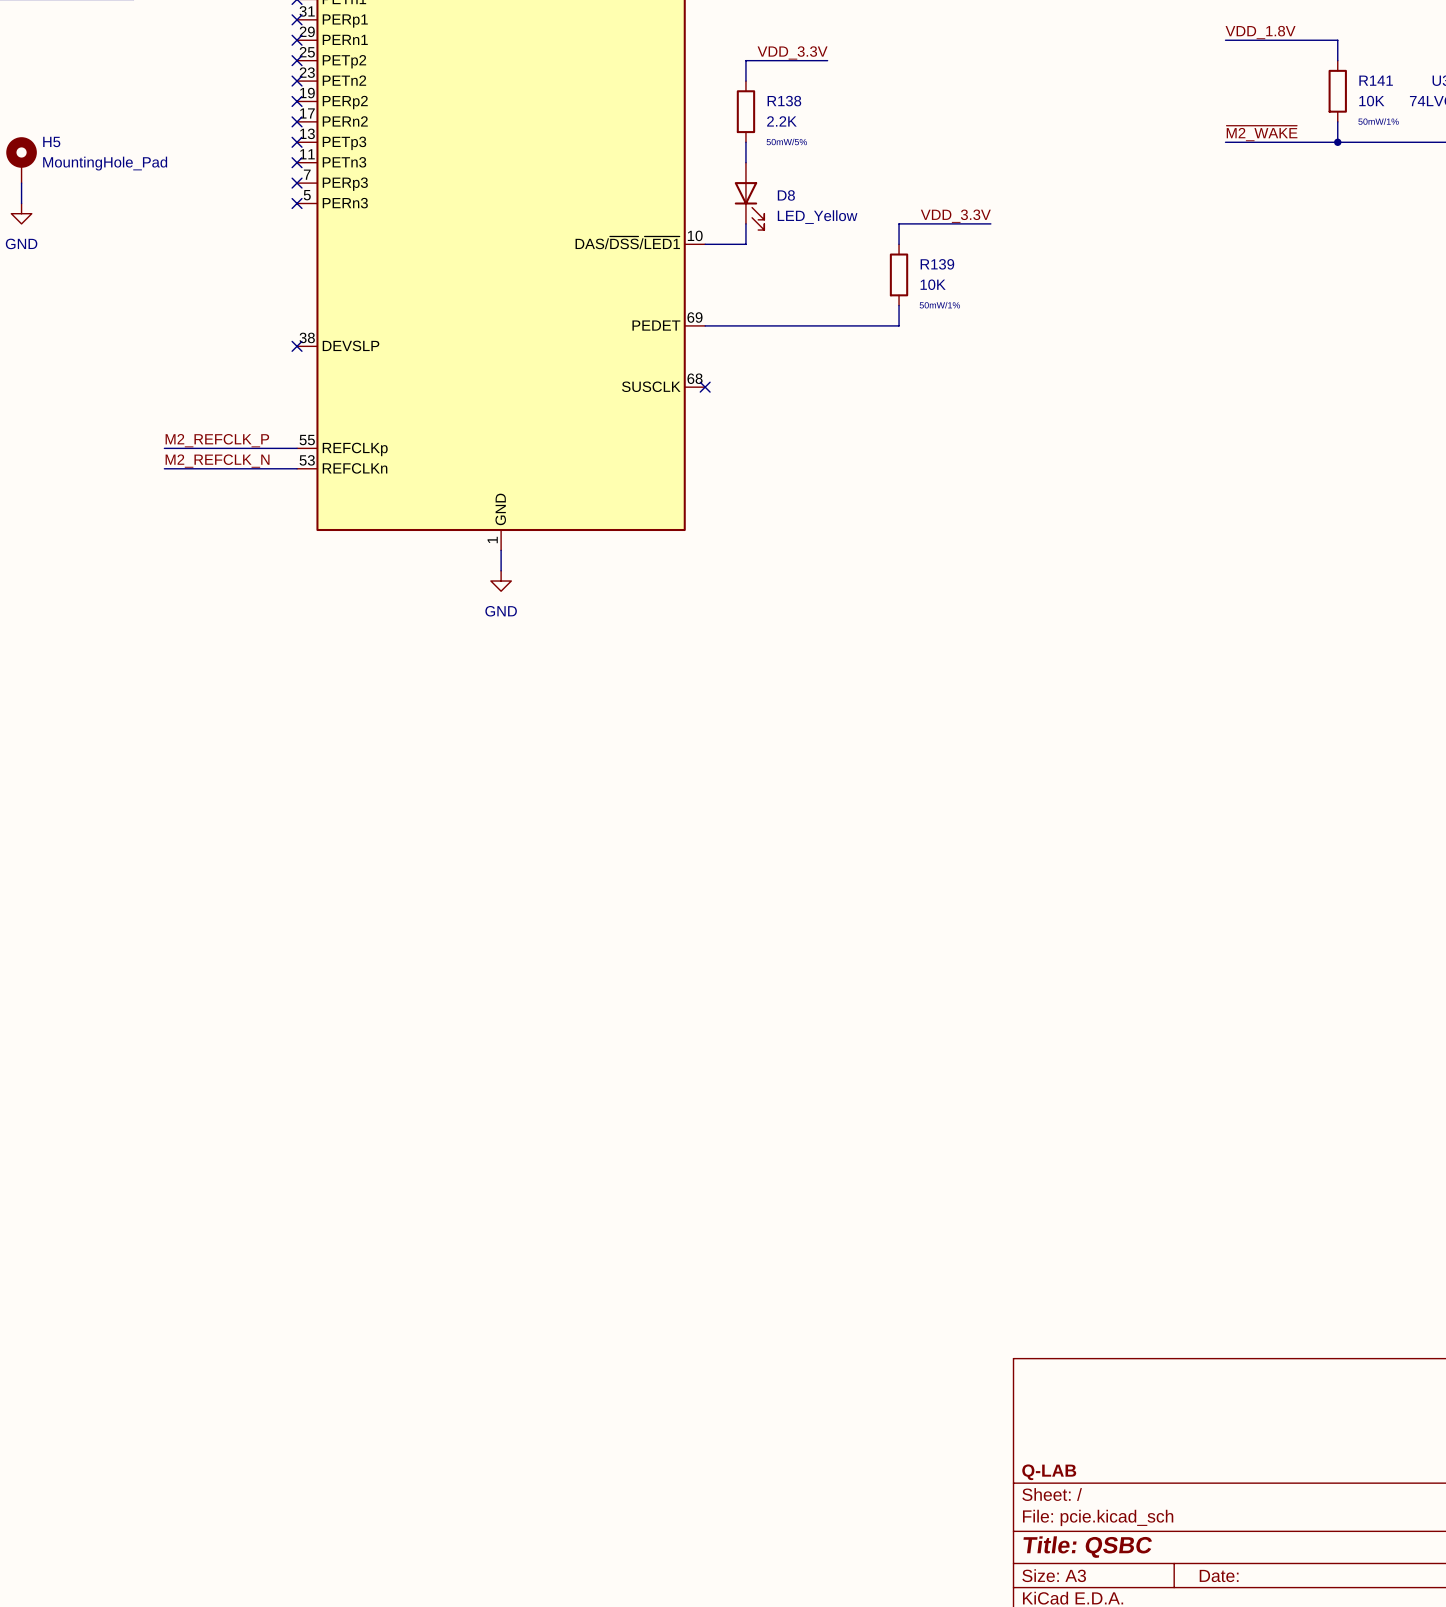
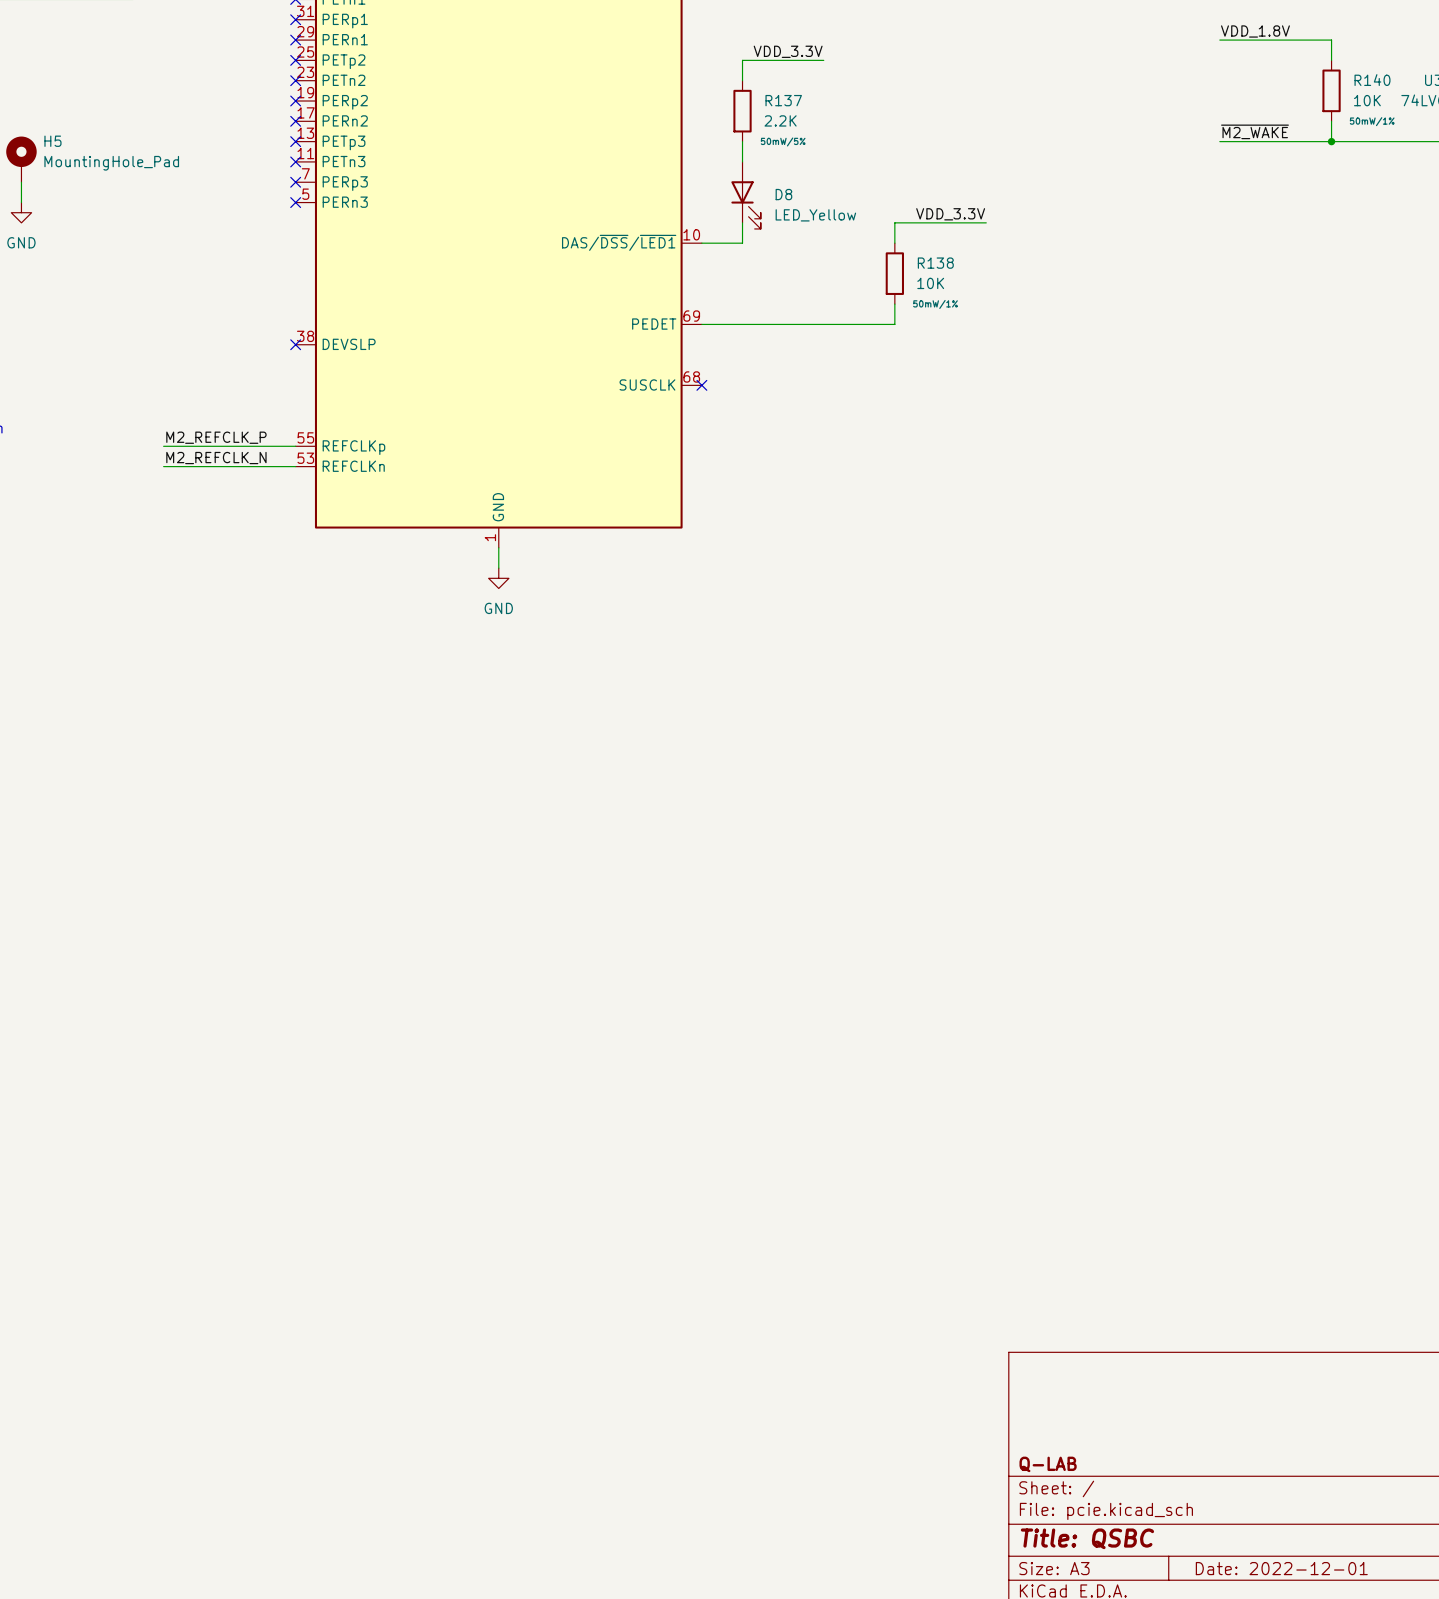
R141 name: R141 (1376, 80) -> R140 (1372, 80)
R138 name: R138 (784, 101) -> R137 (783, 100)
R139 name: R139 (937, 264) -> R138 (935, 263)
title block: Date: (1219, 1575) -> Date: 2022-12-01 (1281, 1568)

